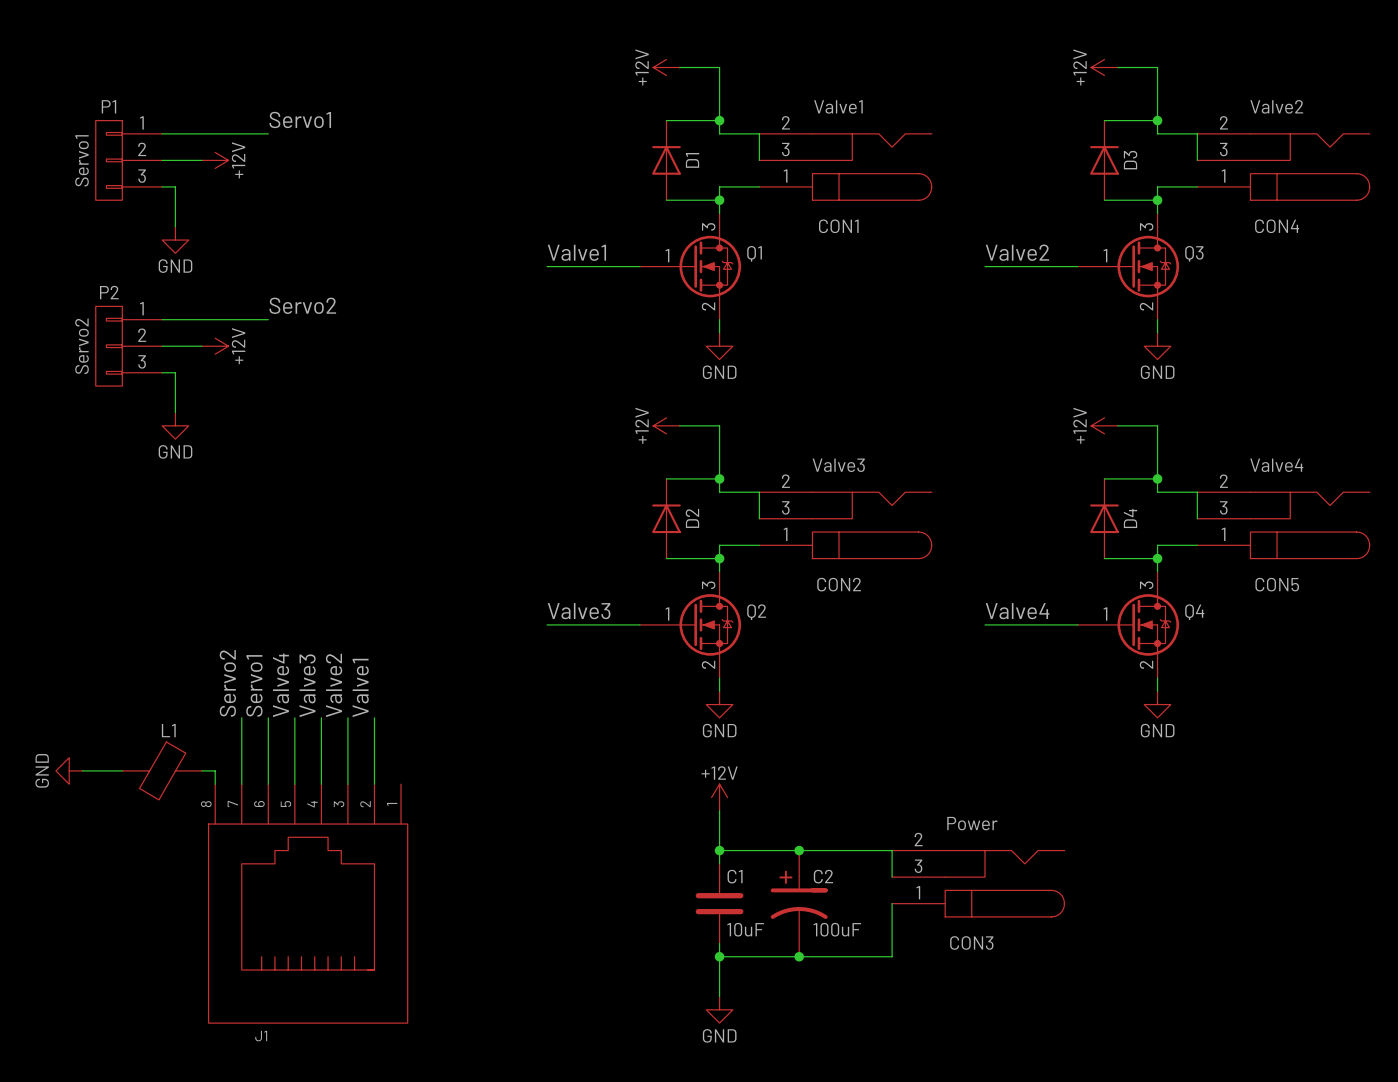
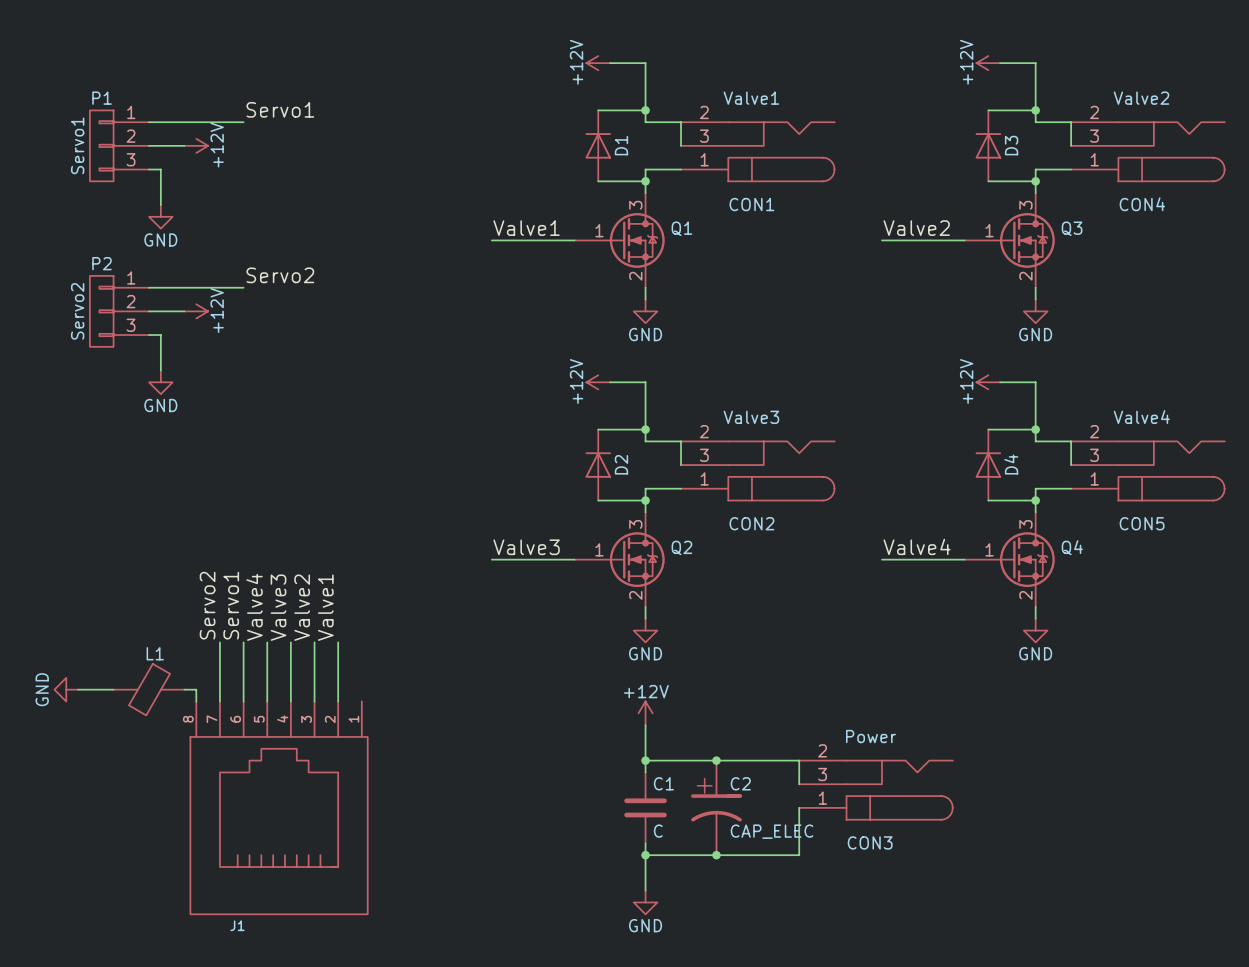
C1 value: 10uF (745, 929) -> C (658, 831)
C2 value: 100uF (837, 929) -> CAP_ELEC (772, 831)

